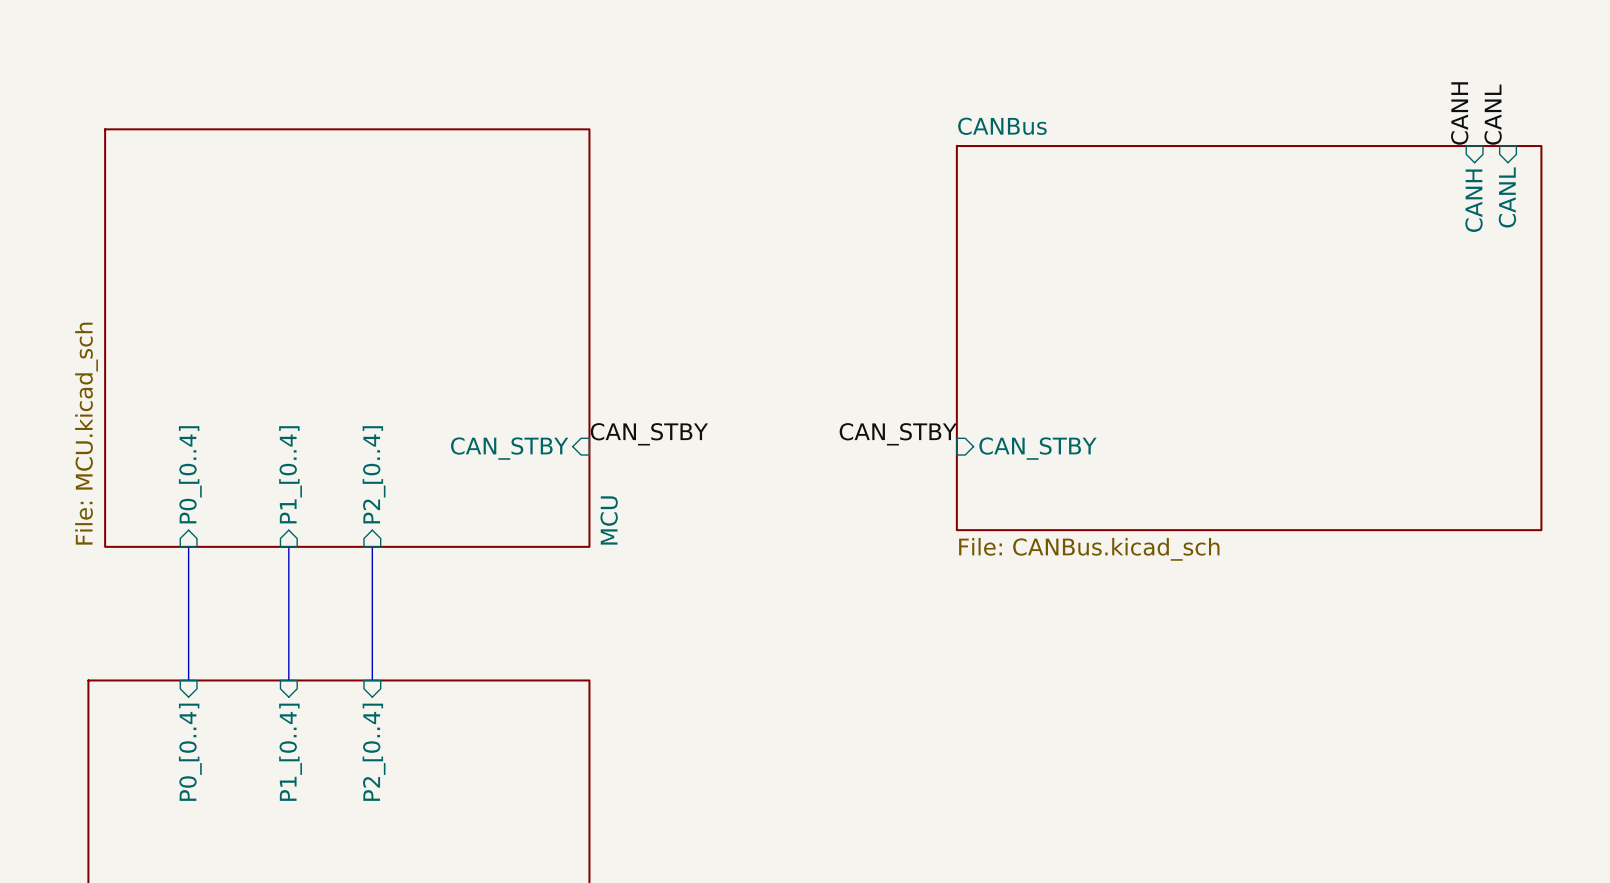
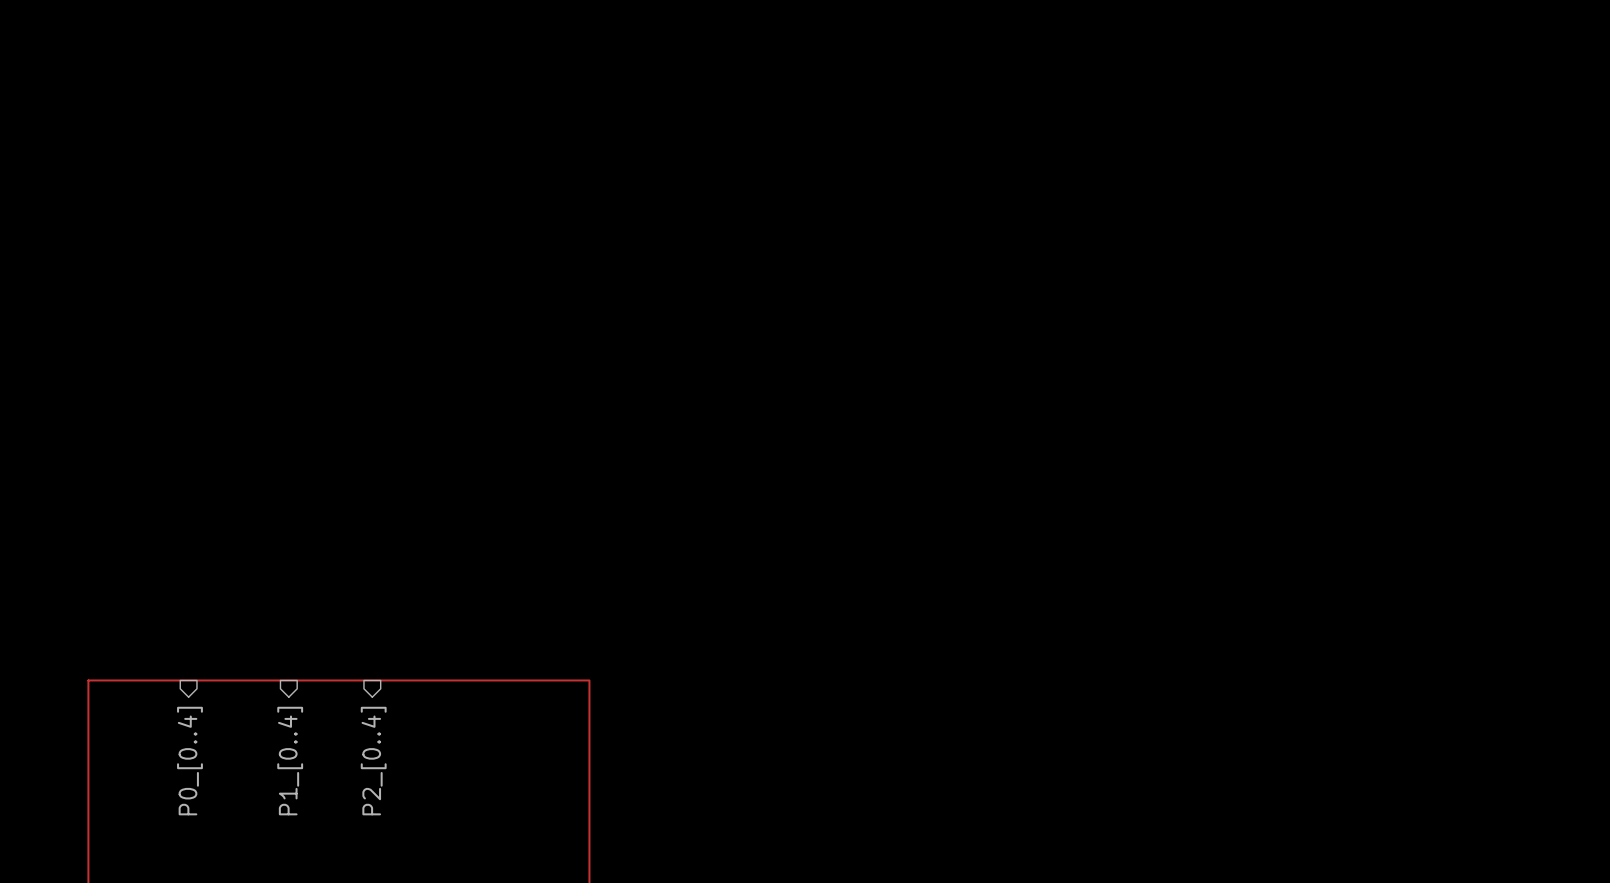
label: CANH (1459, 113) -> none
label: CANL (1493, 114) -> none
sheet pin: CANL (1507, 197) -> none
sheet pin: CANH (1474, 200) -> none
sheet MCU: File: MCU.kicad_sch (347, 338) -> none
sheet CANBus: File: CANBus.kicad_sch (1249, 338) -> none
label: CAN_STBY (649, 434) -> none
label: CAN_STBY (898, 434) -> none
sheet pin: CAN_STBY (509, 448) -> none
sheet pin: CAN_STBY (1038, 448) -> none
sheet pin: P0_[0..4] (190, 474) -> none
sheet pin: P1_[0..4] (290, 474) -> none
sheet pin: P2_[0..4] (374, 474) -> none
bus: (188, 546) (188, 680) -> none
bus: (288, 546) (288, 680) -> none
bus: (372, 546) (372, 680) -> none

